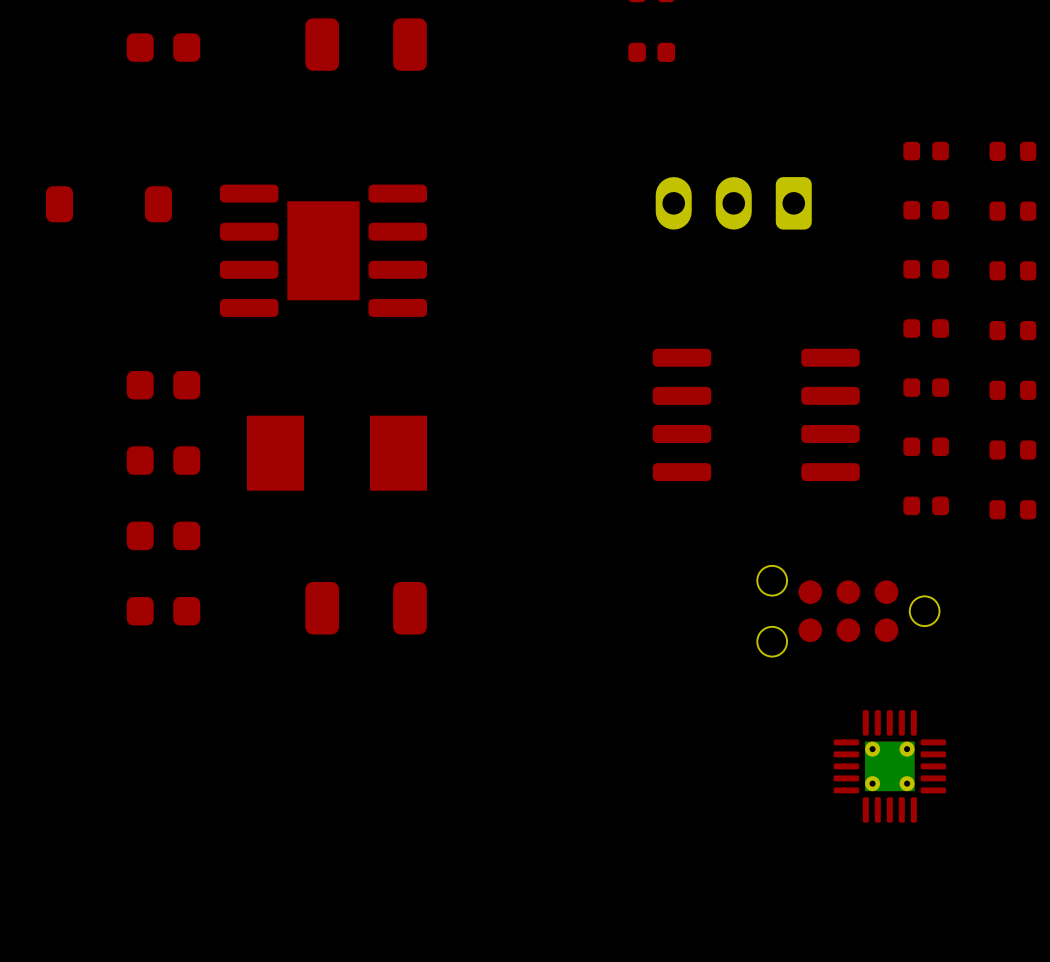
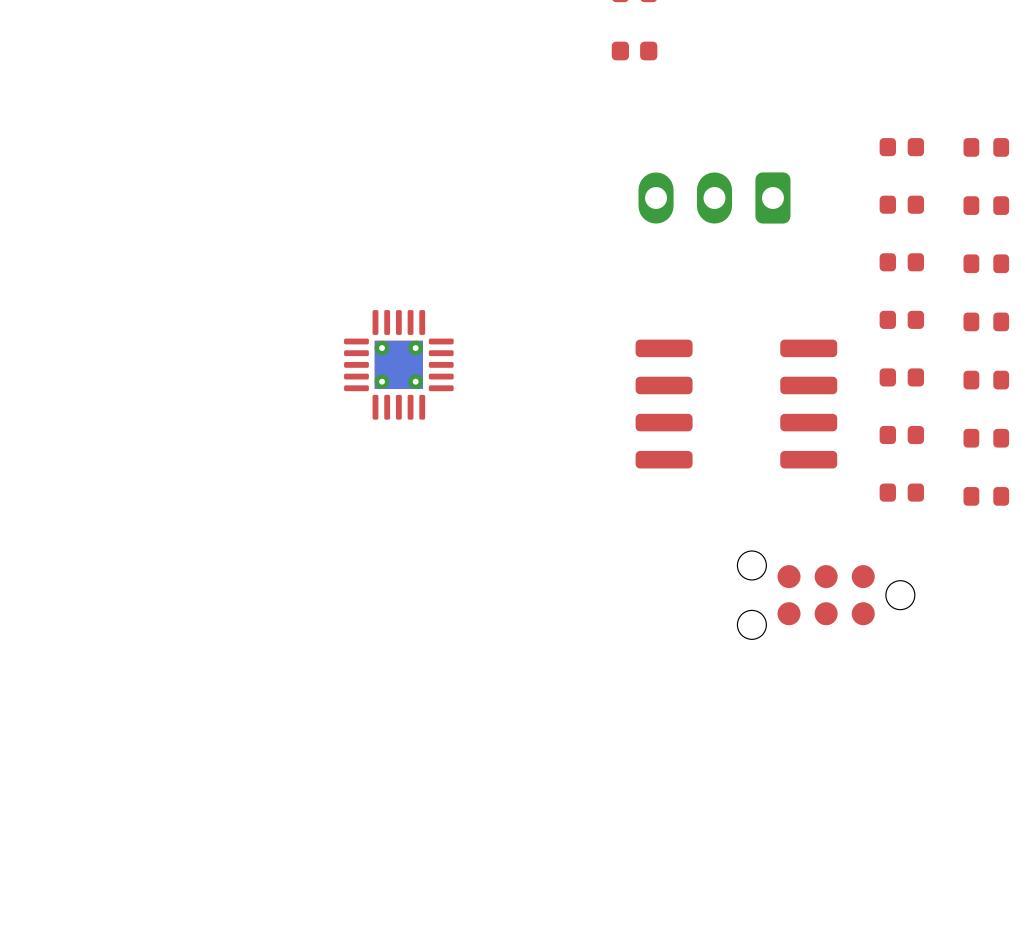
part: (366, 44) -> none
part: (163, 47) -> none
part: (109, 204) -> none
part: (323, 250) -> none
part: (163, 385) -> none
part: (336, 453) -> none
part: (163, 460) -> none
part: (163, 535) -> none
part: (366, 608) -> none
part: (163, 611) -> none
part position: (889, 766) -> (398, 364)

